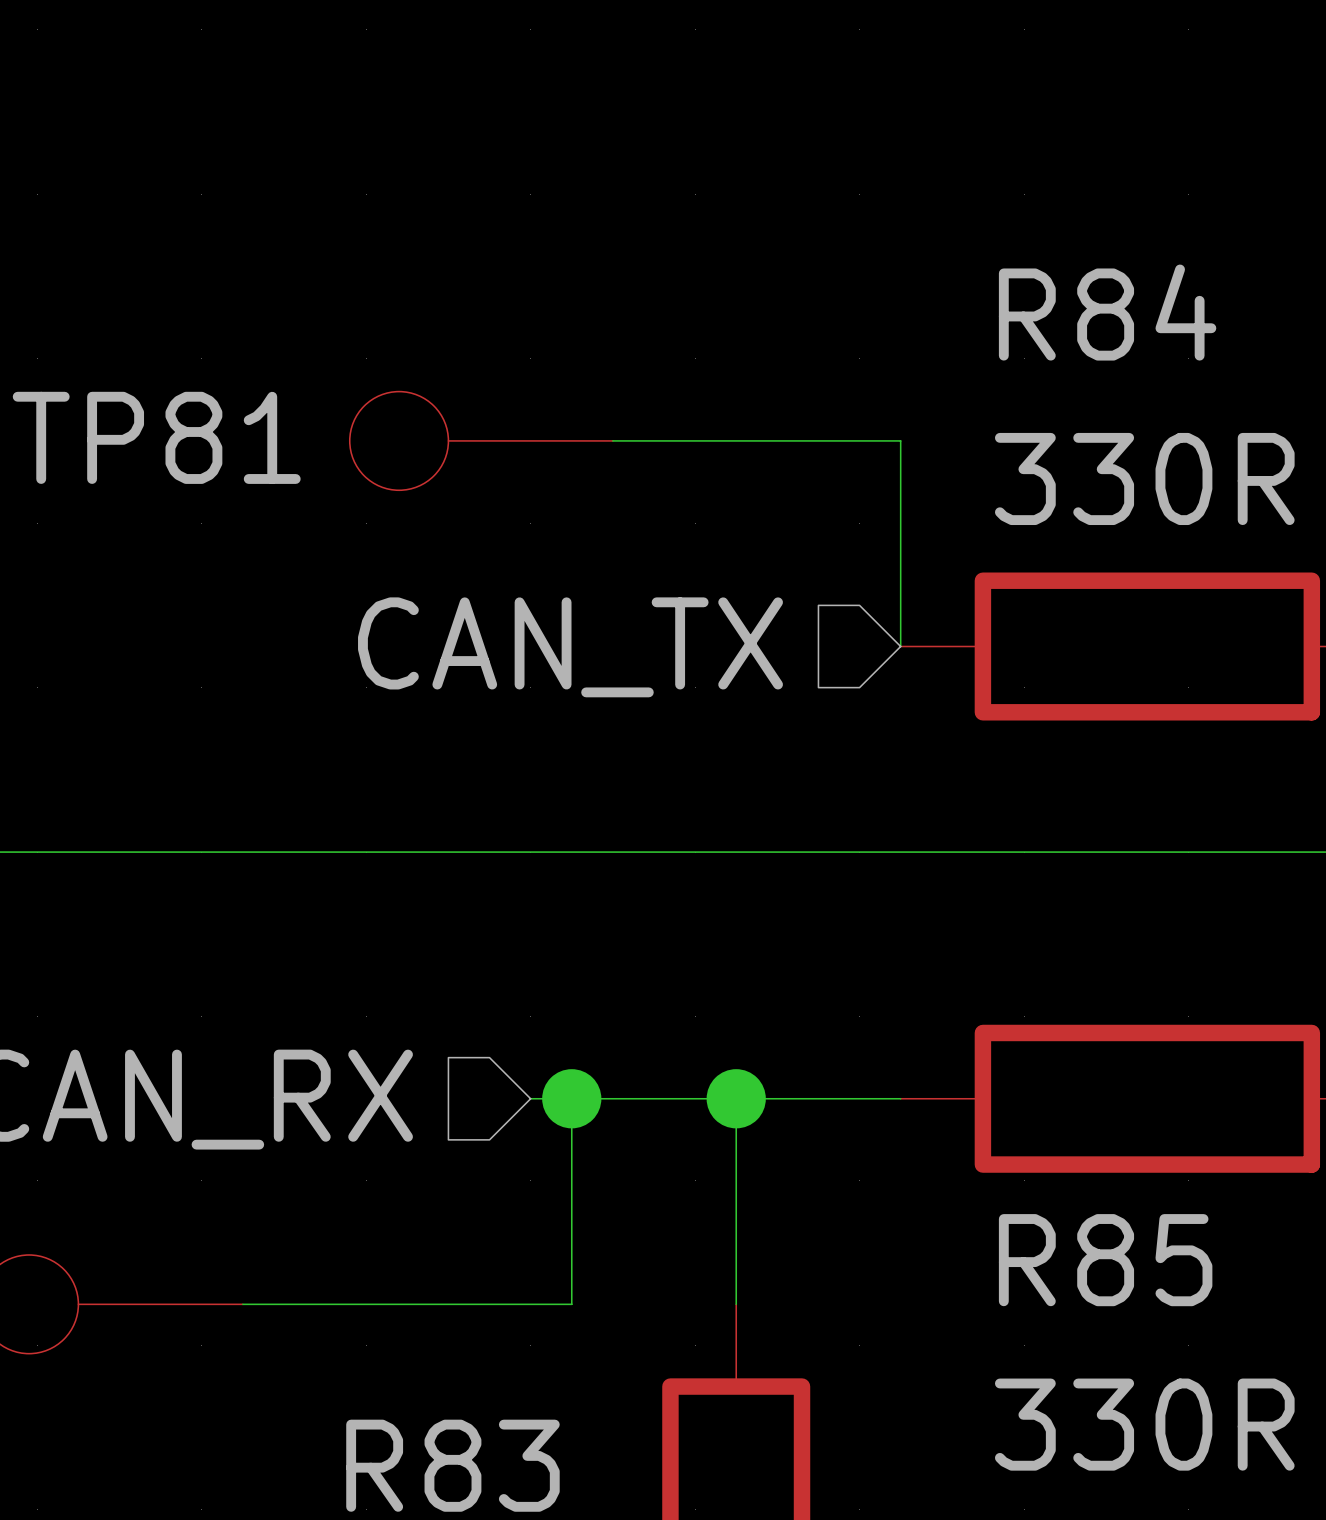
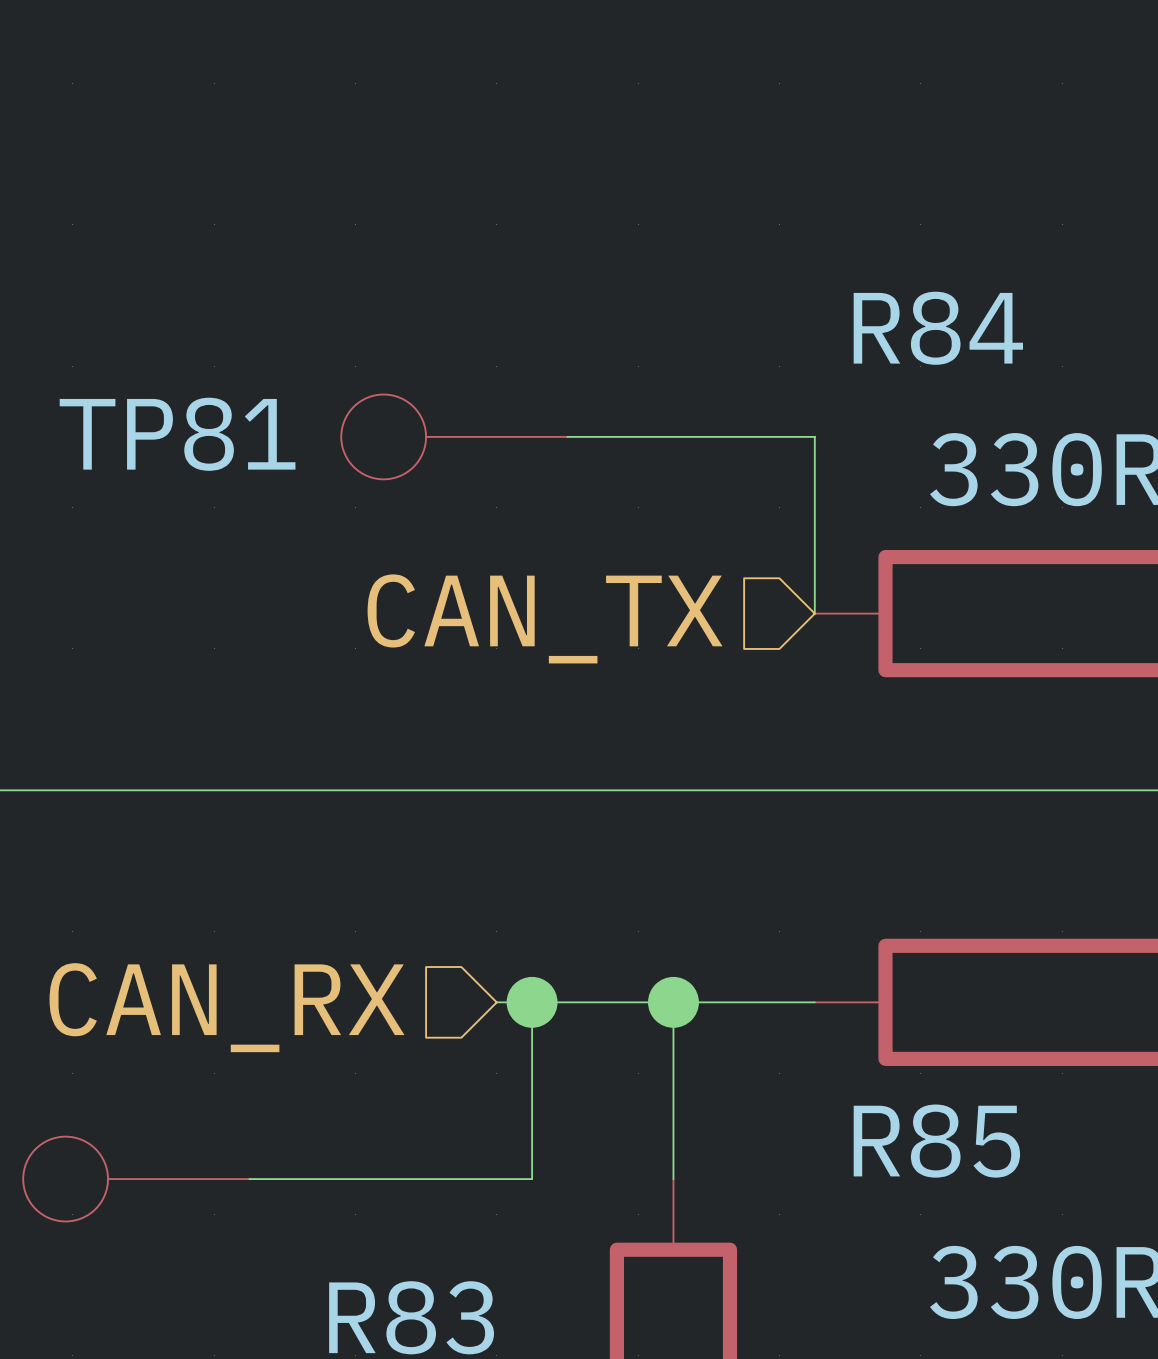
R84 name position: R84 (1107, 312) -> R84 (938, 328)
R85 name position: R85 (1105, 1260) -> R85 (936, 1141)

